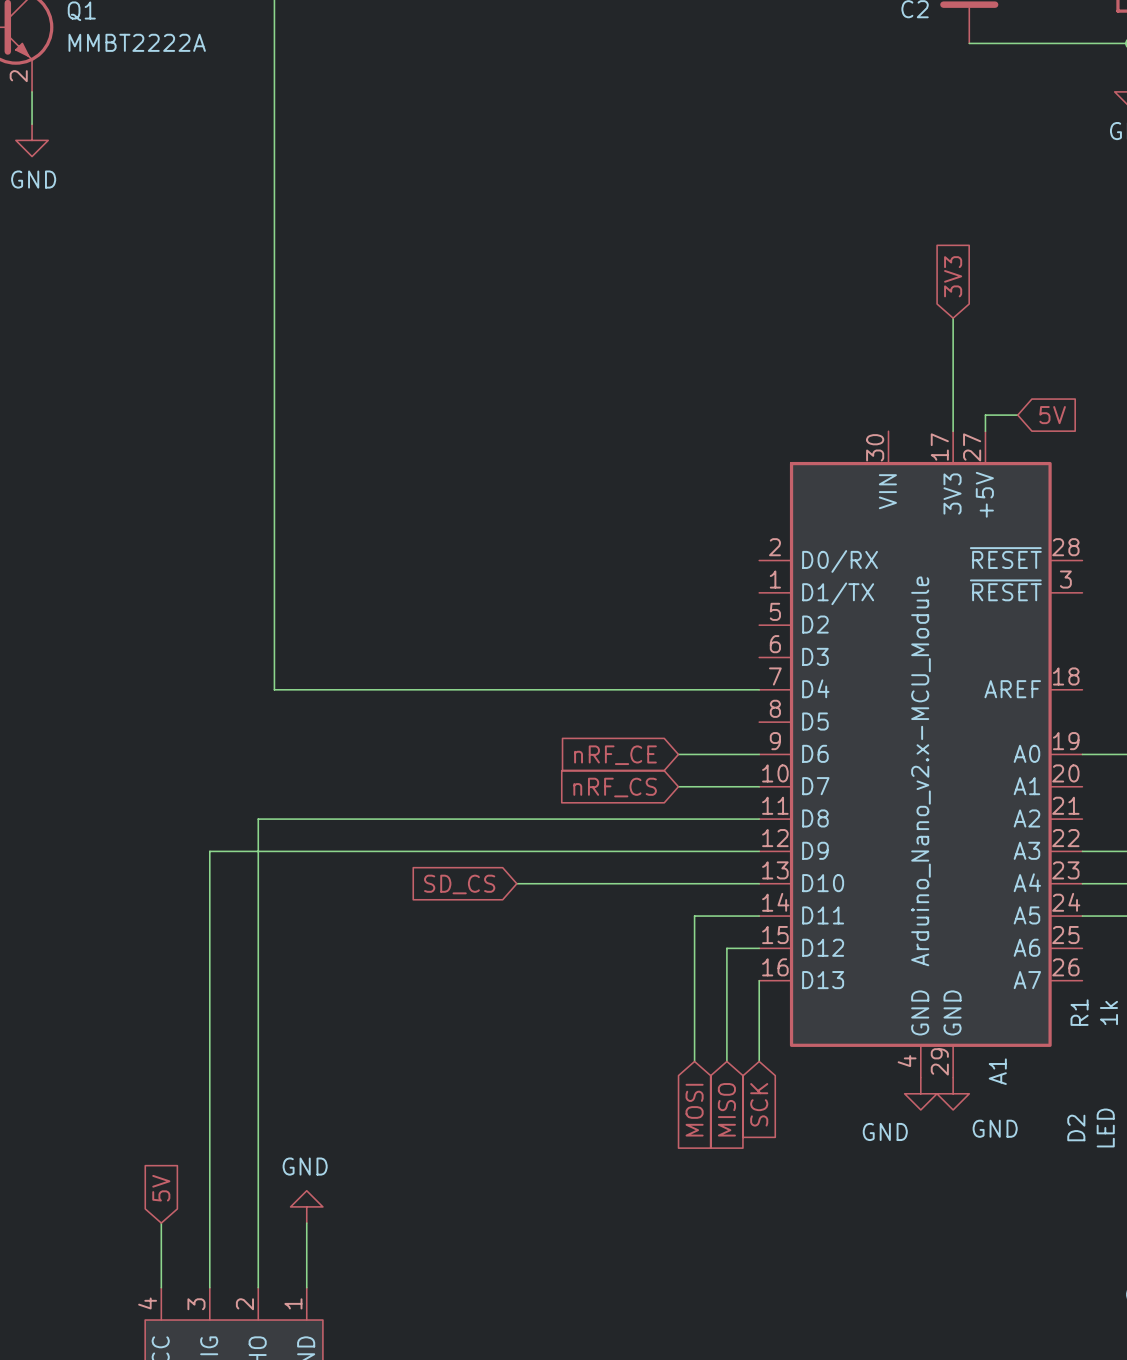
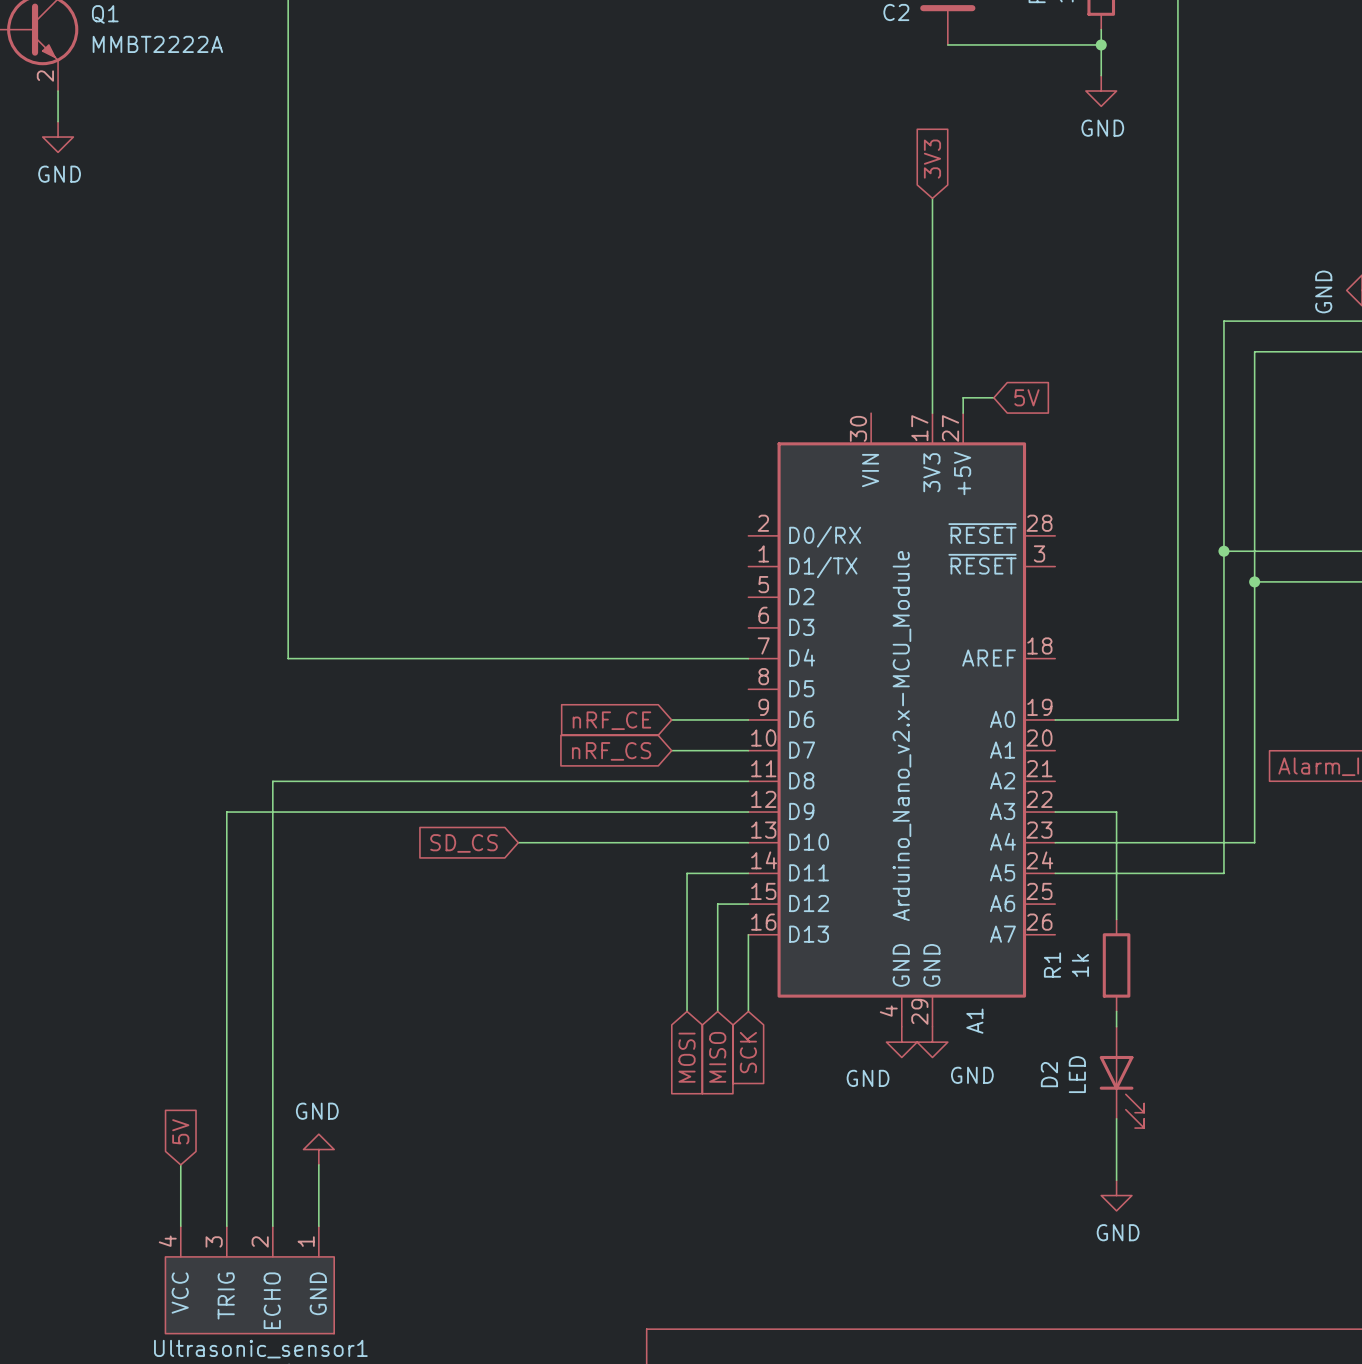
wire: none -> (932, 198) (932, 305)
global label position: 3V3 (953, 276) -> 3V3 (932, 159)

